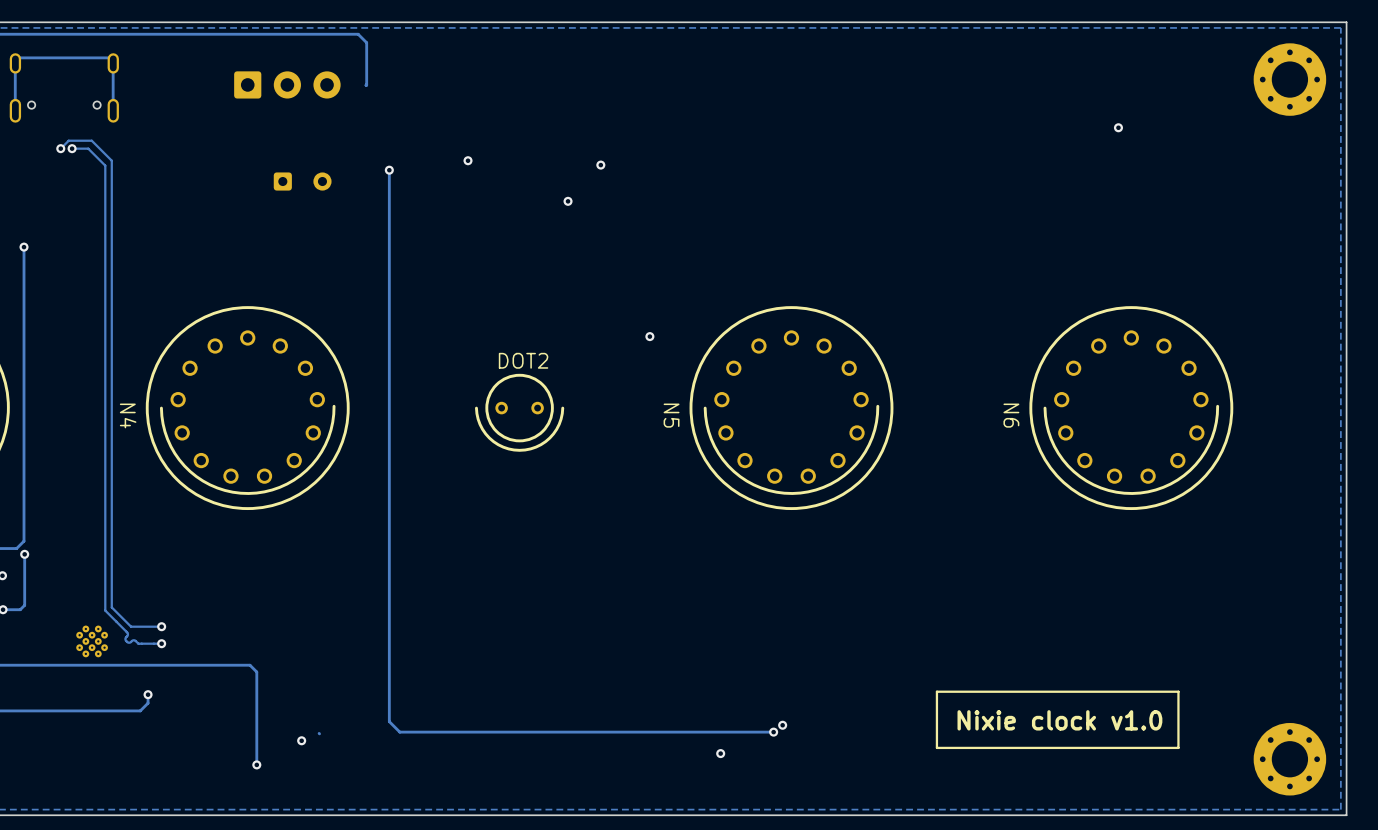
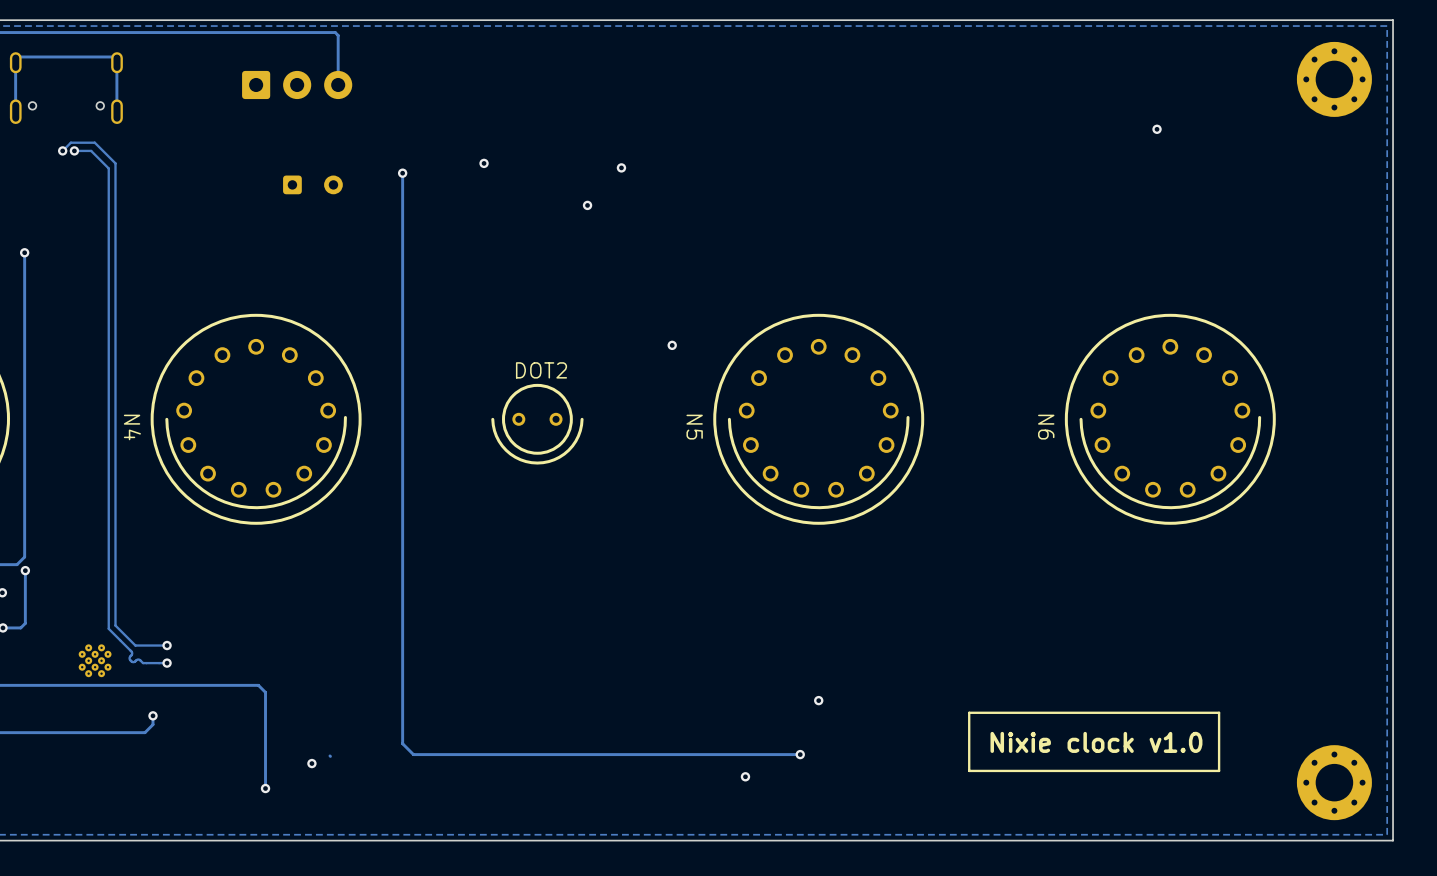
track: (324, 34) (358, 34) (366, 42) (366, 84) -> (335, 32) (338, 35) (338, 84)
via position: (782, 725) -> (818, 700)

